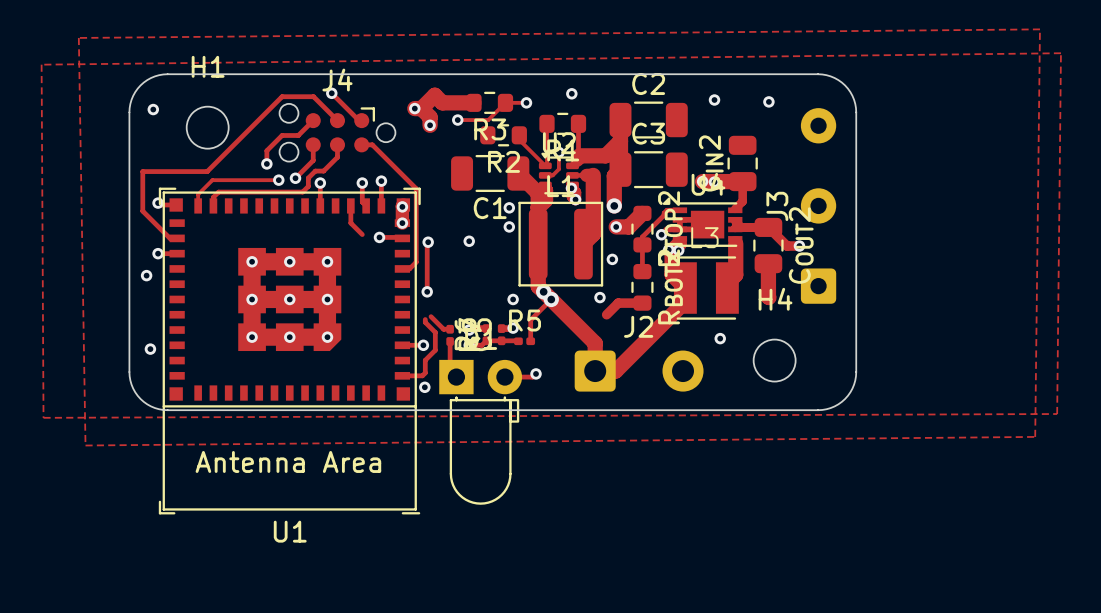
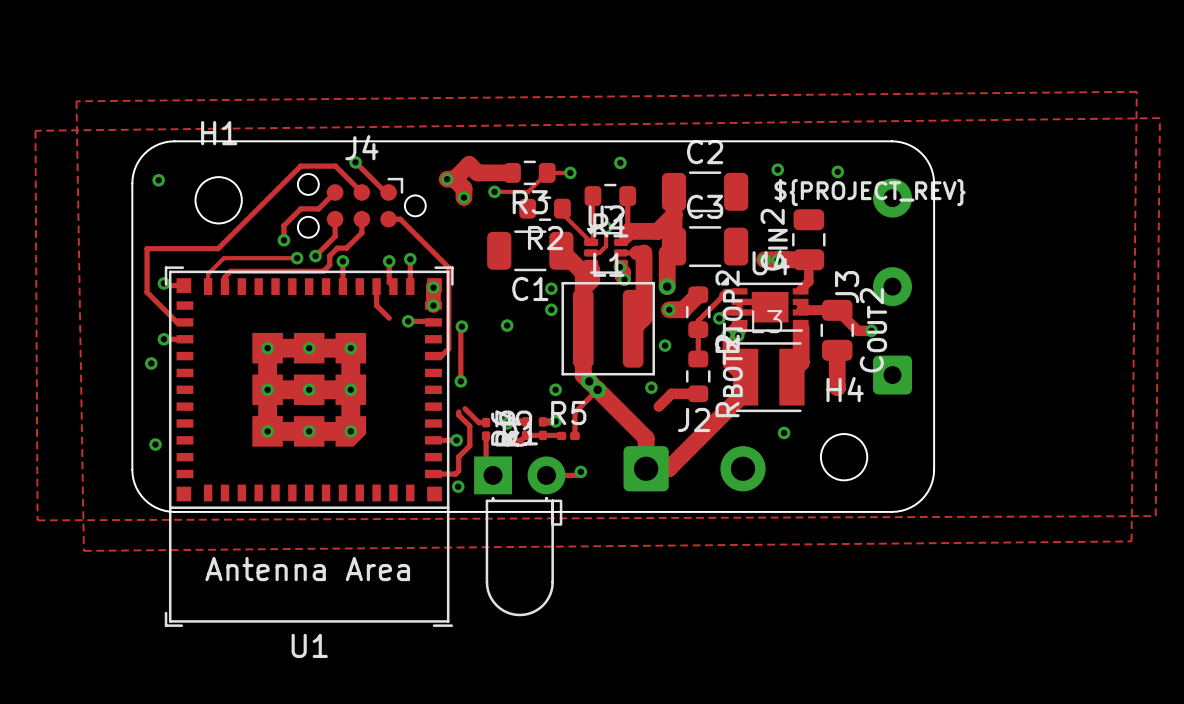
text: none -> ${PROJECT_REV} (870, 192)

